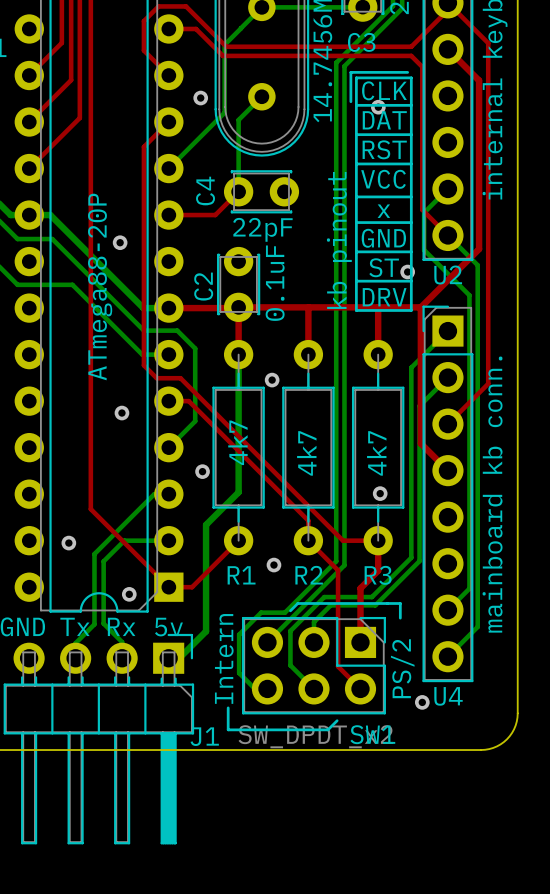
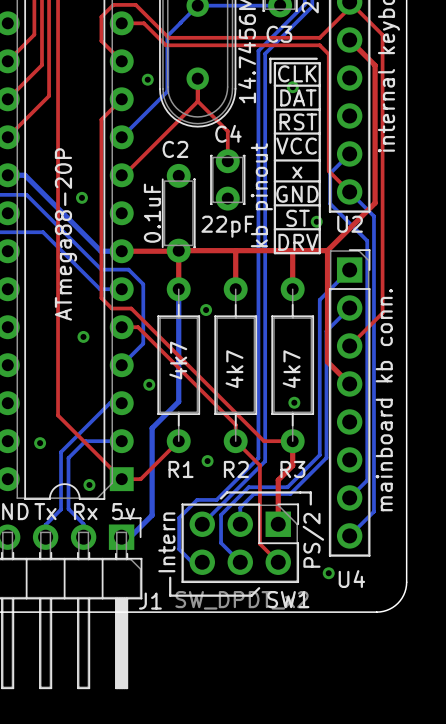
bottom track: (261, 96) (238, 120) (238, 191) -> none
top track: none -> (197, 101) (227, 131) (227, 161)
top track: (238, 191) (215, 215) (171, 215) -> (197, 78) (197, 101) (123, 175)
C4 rotation: 0° (261, 191) -> 90° clockwise (227, 179)
C4 position: (261, 191) -> (227, 179)
C2 footprint: [217, 246, 261, 323] -> [161, 163, 196, 263]
C2 value position: 0.1uF (275, 283) -> 0.1uF (152, 213)
C2 name position: C2 (203, 286) -> C2 (175, 149)
U4 footprint: [422, 305, 474, 683] -> [328, 249, 371, 557]

